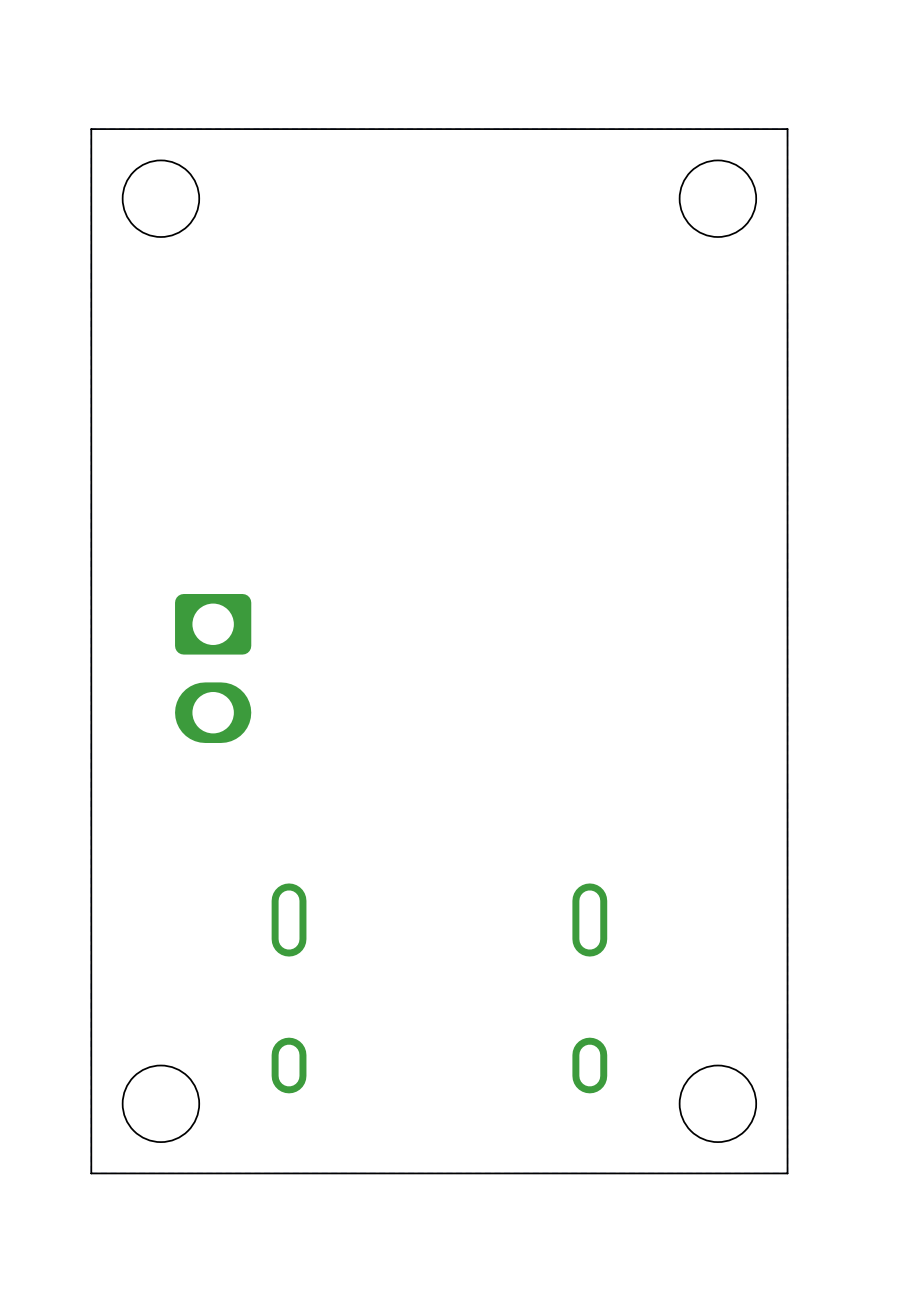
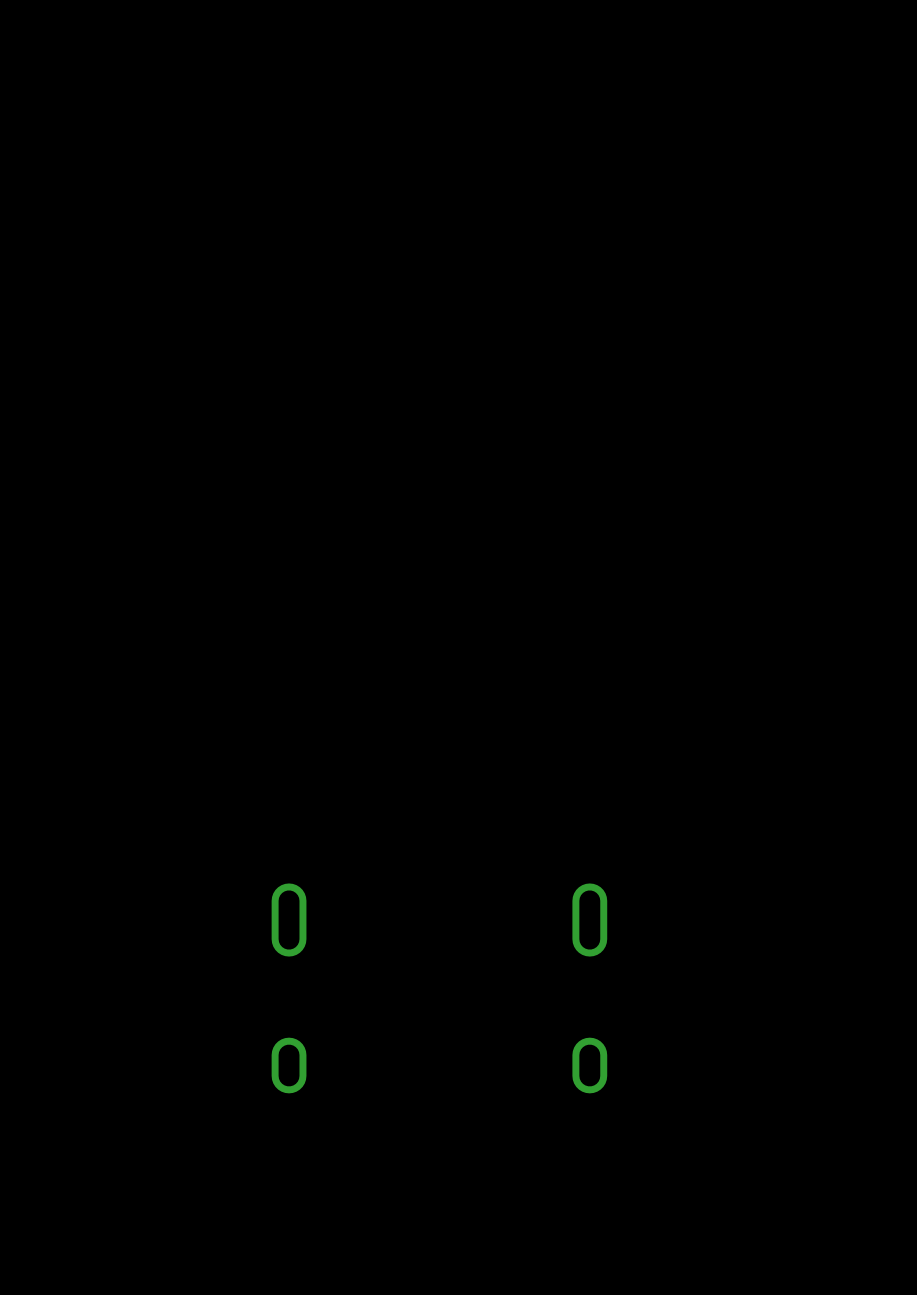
board edge: (787, 129) (787, 1173) (91, 1173) (91, 129) (787, 129) -> none
round board edge: [121, 159, 201, 238] -> none
round board edge: [678, 159, 758, 238] -> none
part: (213, 668) -> none
round board edge: [121, 1064, 201, 1143] -> none
round board edge: [678, 1064, 758, 1143] -> none

